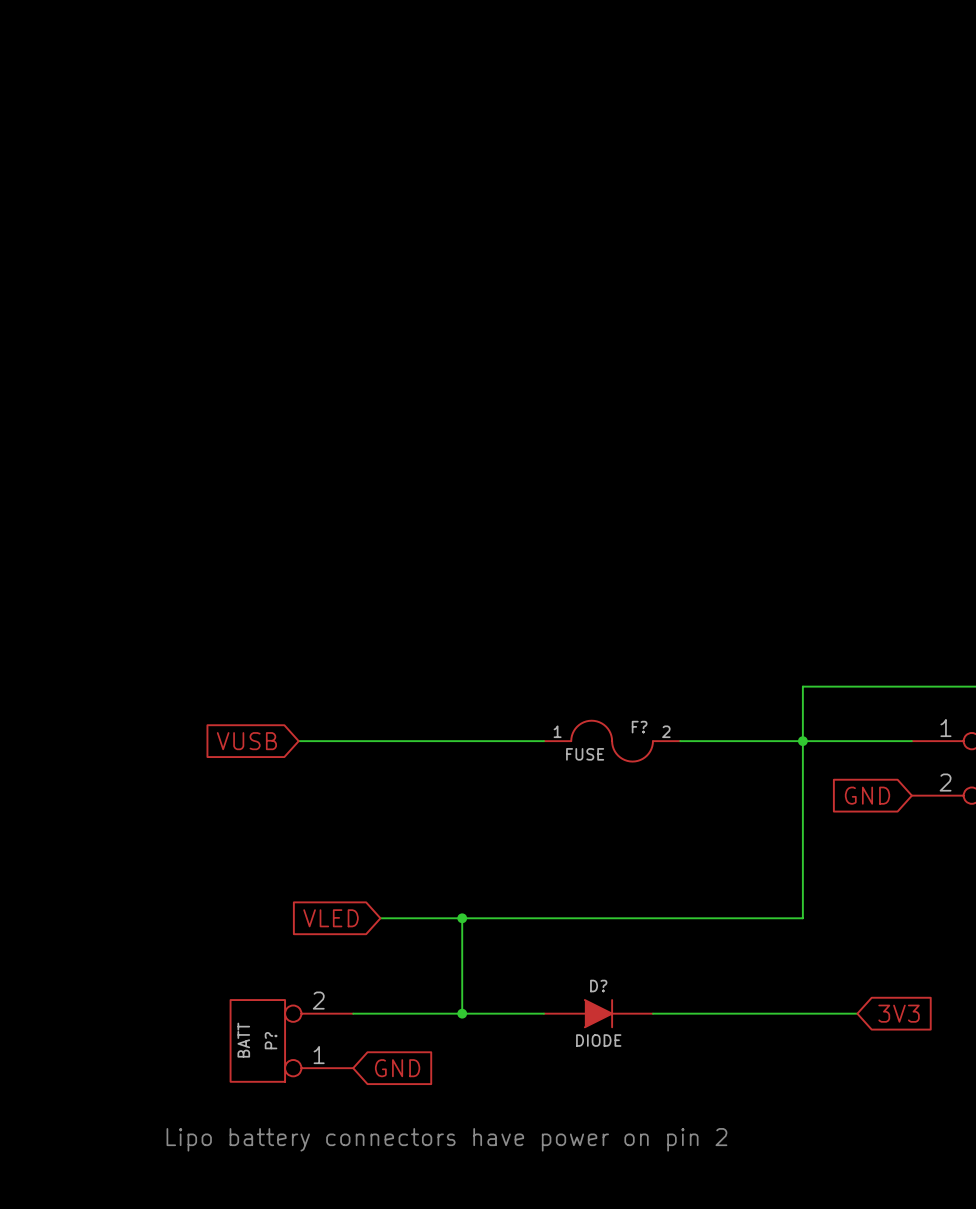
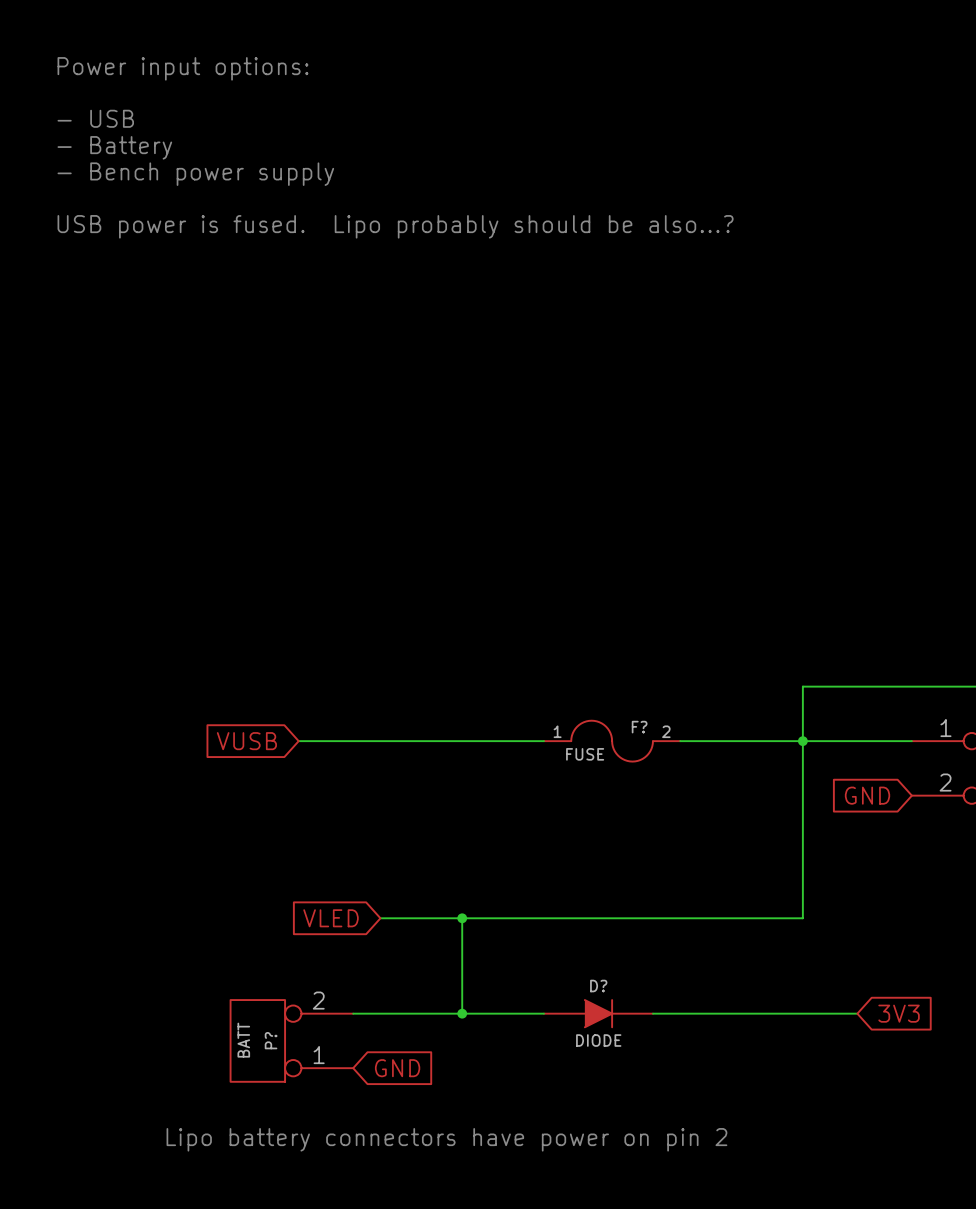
text: none -> Power input options: (182, 68)
text: none -> - USB (95, 118)
text: none -> - Battery (114, 147)
text: none -> - Bench power supply (195, 174)
text: none -> USB power is fused. Lipo probably should be also...? (395, 226)

